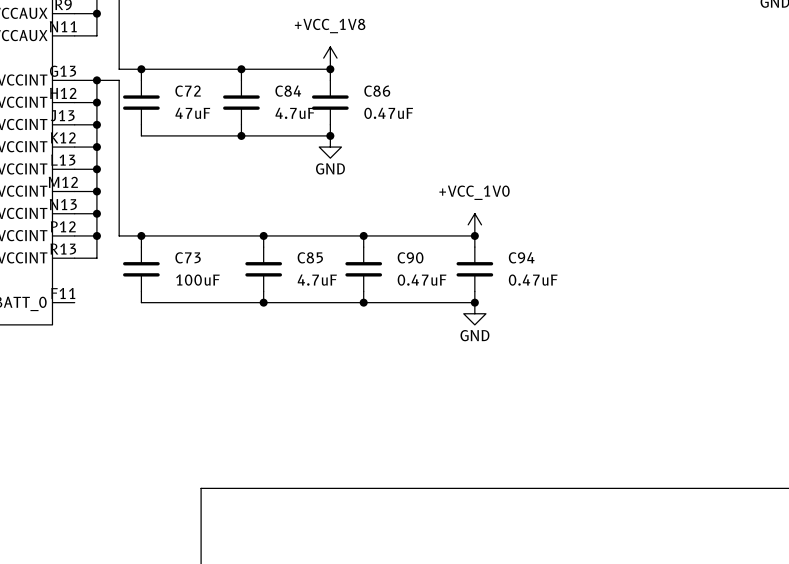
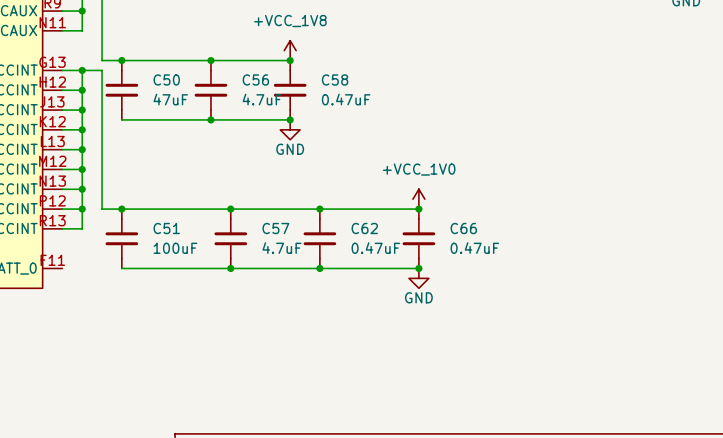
C72 name: C72 (188, 91) -> C50 (166, 79)
C84 name: C84 (288, 91) -> C56 (255, 79)
C86 name: C86 (377, 91) -> C58 (335, 79)
C73 name: C73 (188, 257) -> C51 (166, 228)
C85 name: C85 (310, 257) -> C57 (275, 228)
C90 name: C90 (410, 257) -> C62 (364, 228)
C94 name: C94 (521, 257) -> C66 (463, 228)

